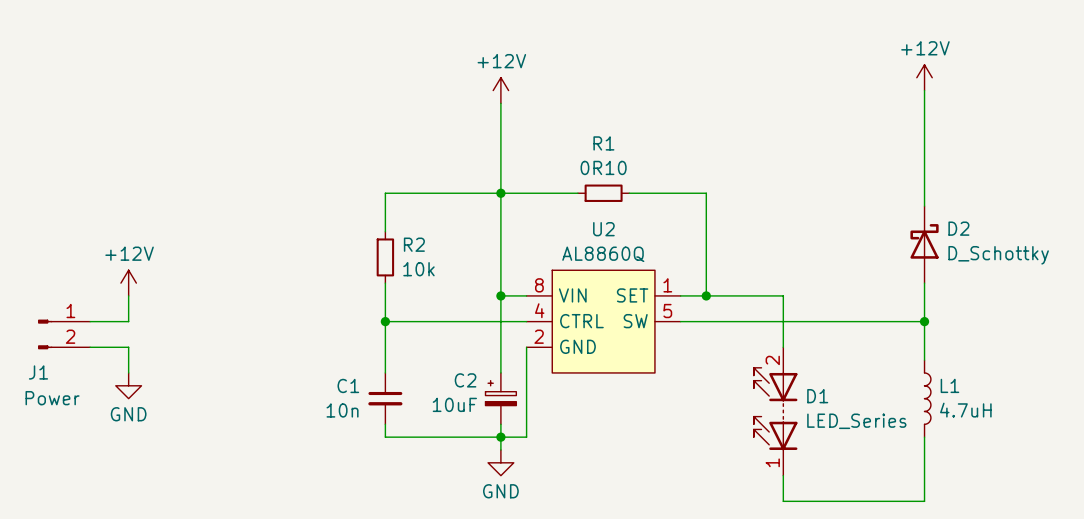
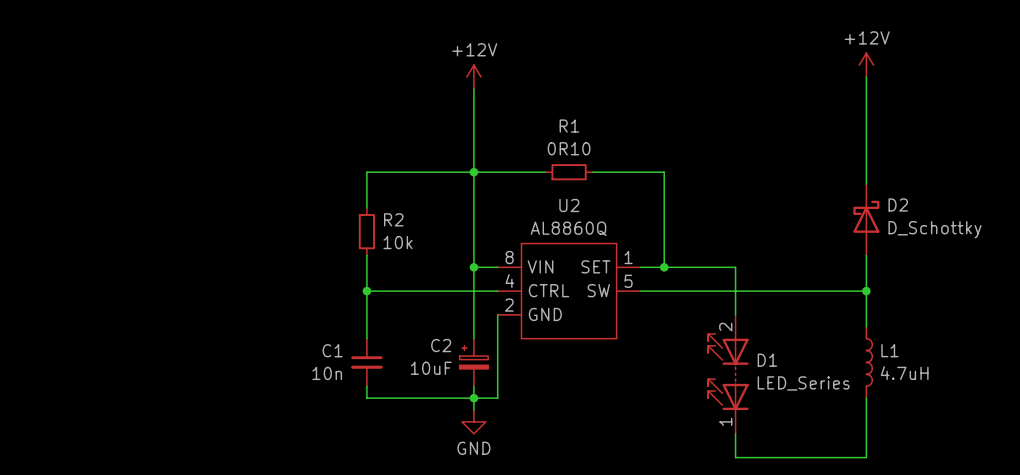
power symbol: +12V (128, 283) -> none
wire: (128, 295) (128, 321) (90, 321) -> none
J1: Power (64, 334) -> none
wire: (90, 347) (128, 347) (128, 372) -> none
power symbol: GND (128, 385) -> none

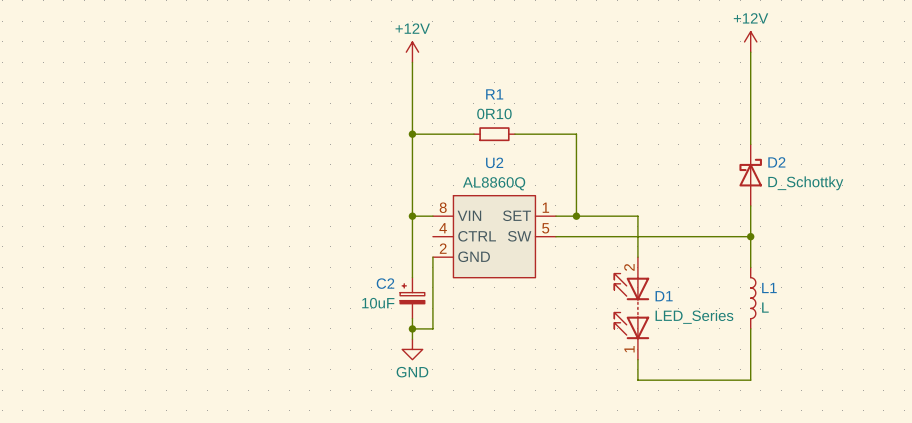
wire: (473, 172) (366, 172) (366, 207) -> none
R2: 10k (366, 231) -> none
wire: (366, 255) (366, 338) -> none
wire: (366, 291) (497, 291) -> none
junction: (366, 291) -> none
C1: 10n (366, 362) -> none
L1 value: 4.7uH (904, 373) -> L (765, 307)
wire: (366, 386) (366, 398) (473, 398) -> none

